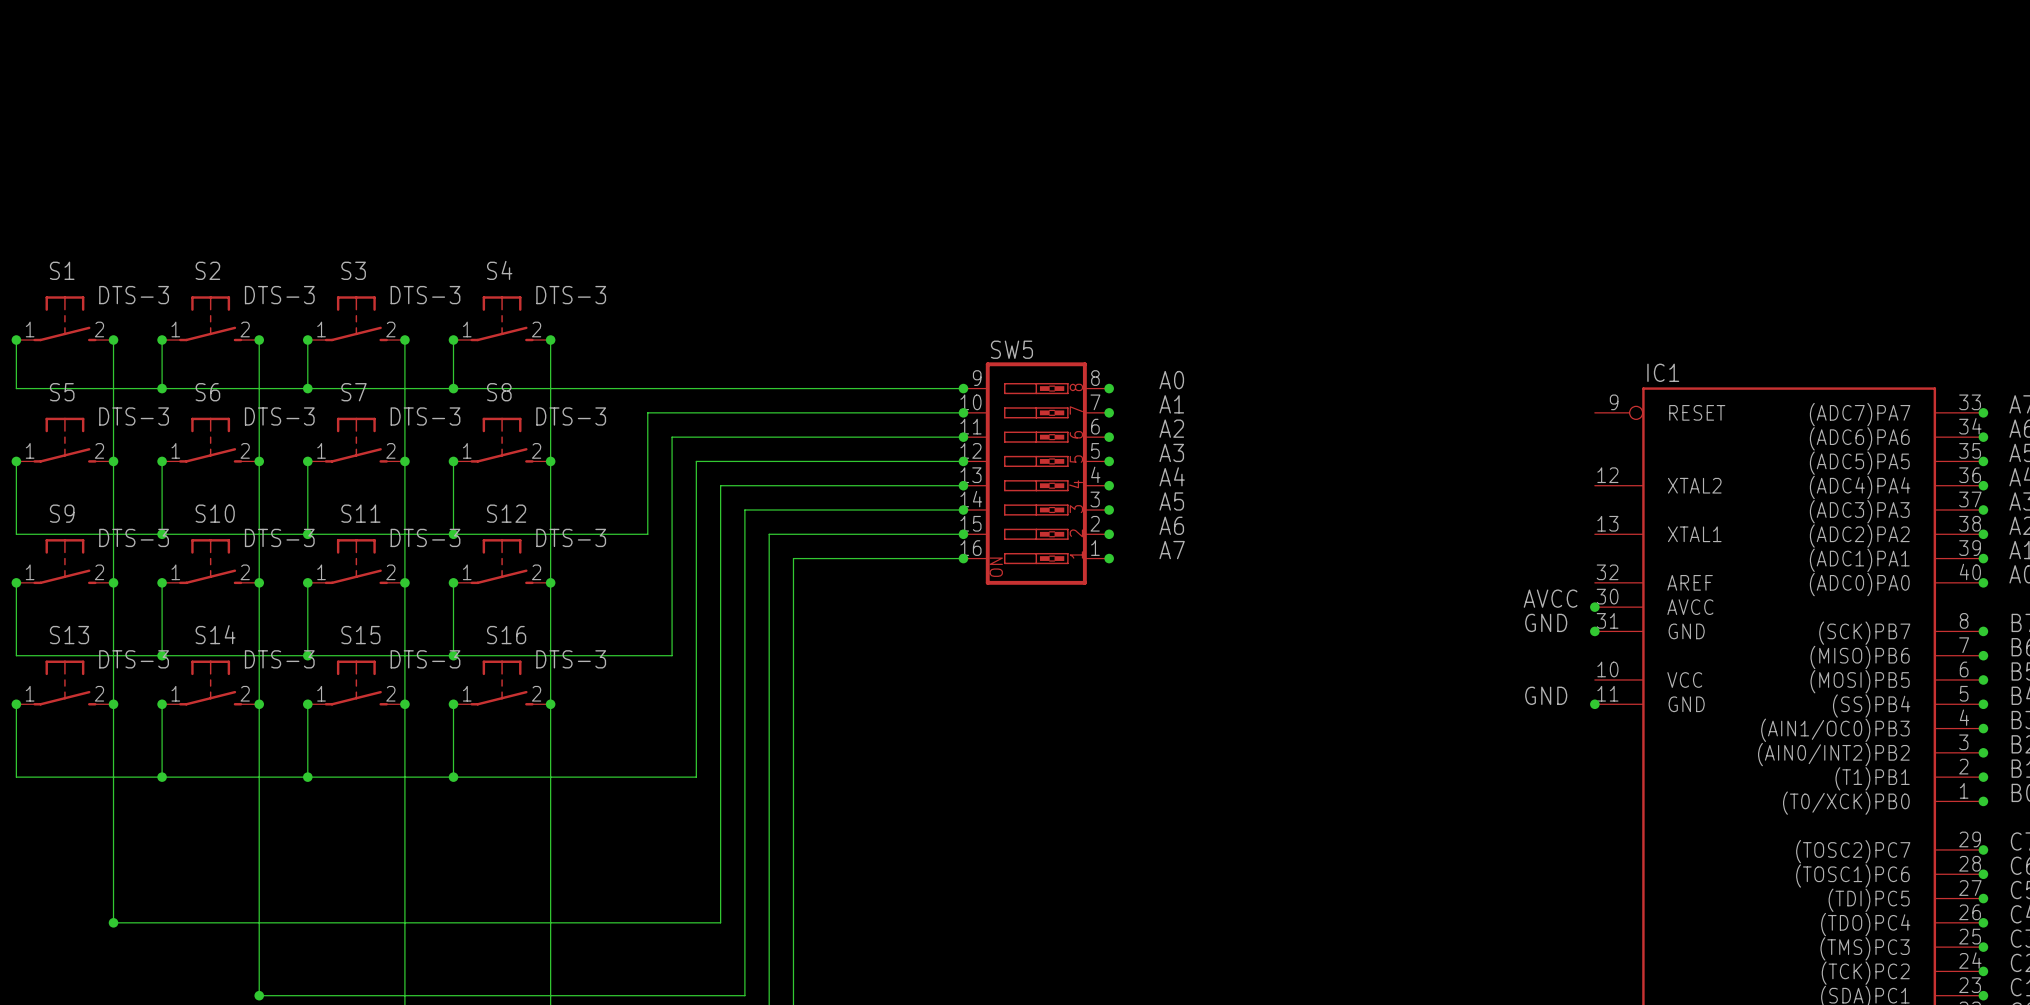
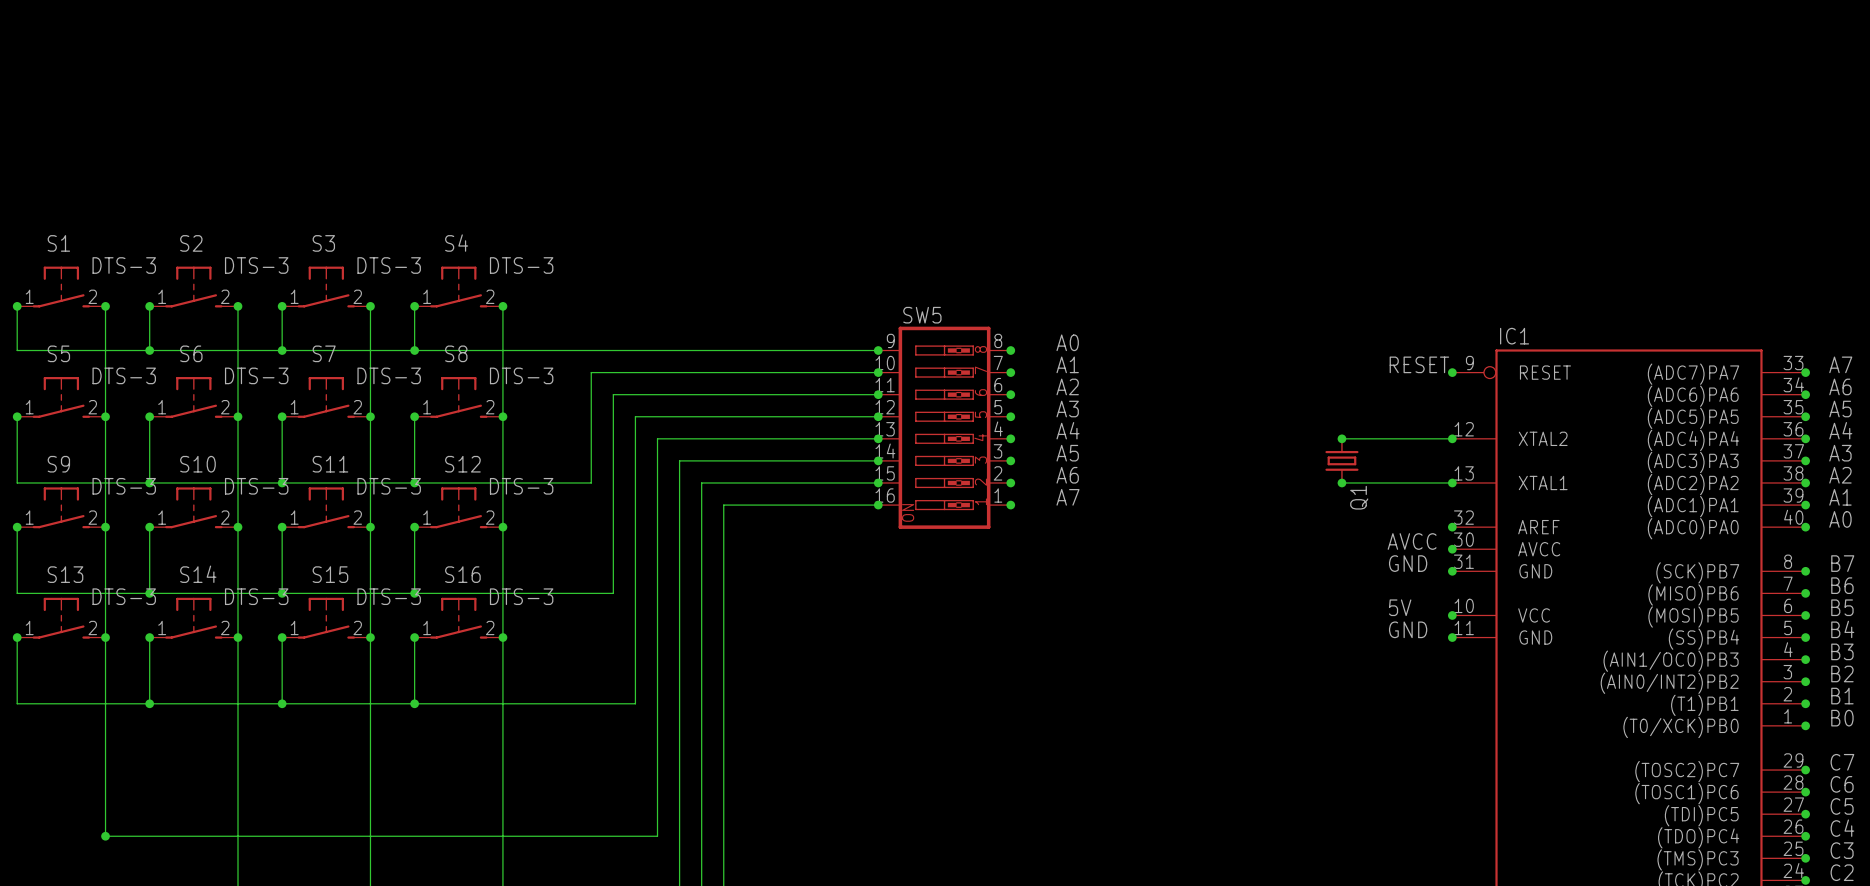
label: none -> RESET (1419, 364)
junction: none -> (1452, 372)
wire: none -> (1341, 438) (1452, 438)
junction: none -> (1341, 438)
junction: none -> (1452, 438)
Q1: none -> (1341, 460)
wire: none -> (1341, 482) (1452, 482)
junction: none -> (1341, 482)
junction: none -> (1452, 482)
junction: none -> (1452, 527)
label: none -> 5V (1400, 607)
junction: none -> (1452, 615)

